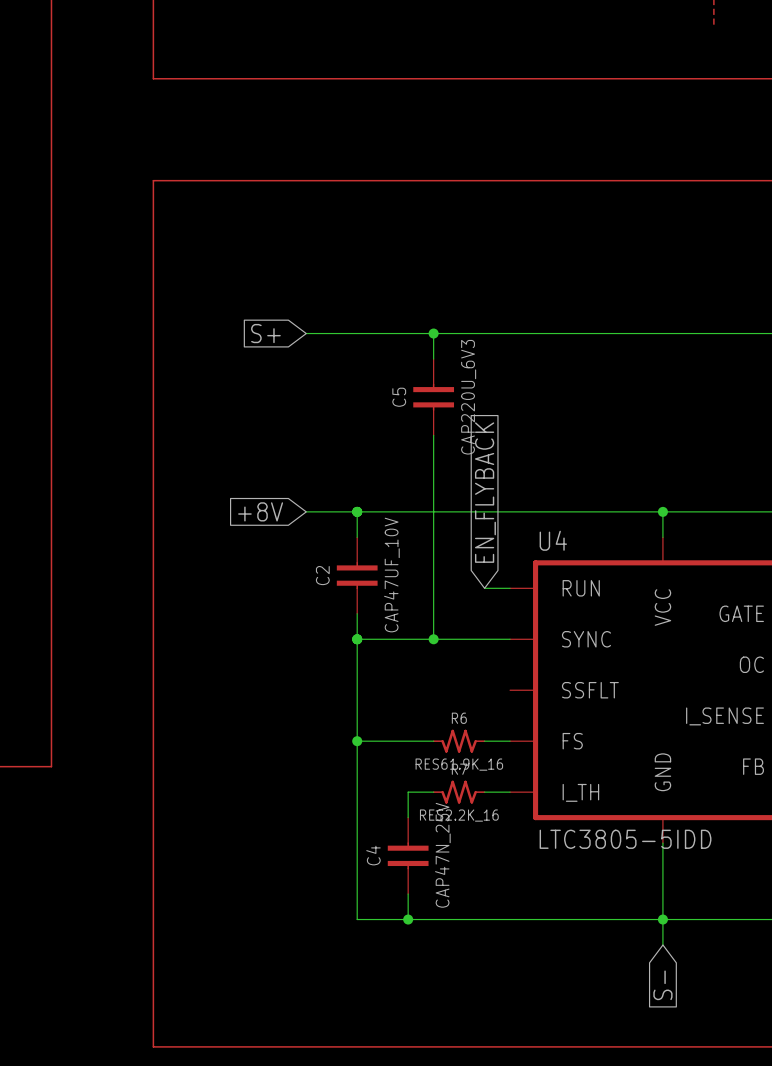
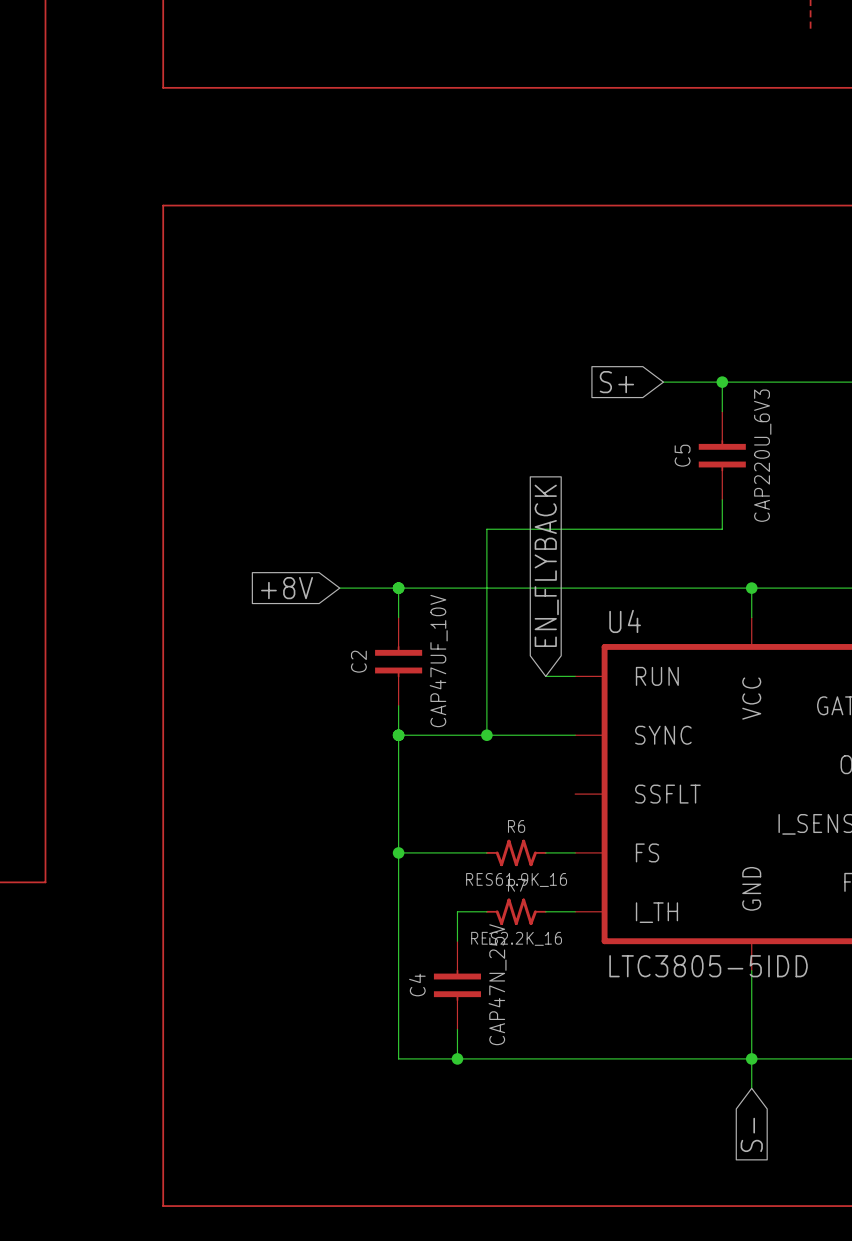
global label: S+ (265, 333) -> none
wire: (306, 333) (586, 333) -> none
wire: (433, 333) (433, 359) -> (722, 382) (722, 411)
junction: (433, 333) -> none
global label: none -> S+ (616, 382)
junction: none -> (722, 382)
C5 position: (433, 397) -> (722, 455)
wire: (433, 435) (433, 460) -> (722, 499) (722, 529) (486, 529)

